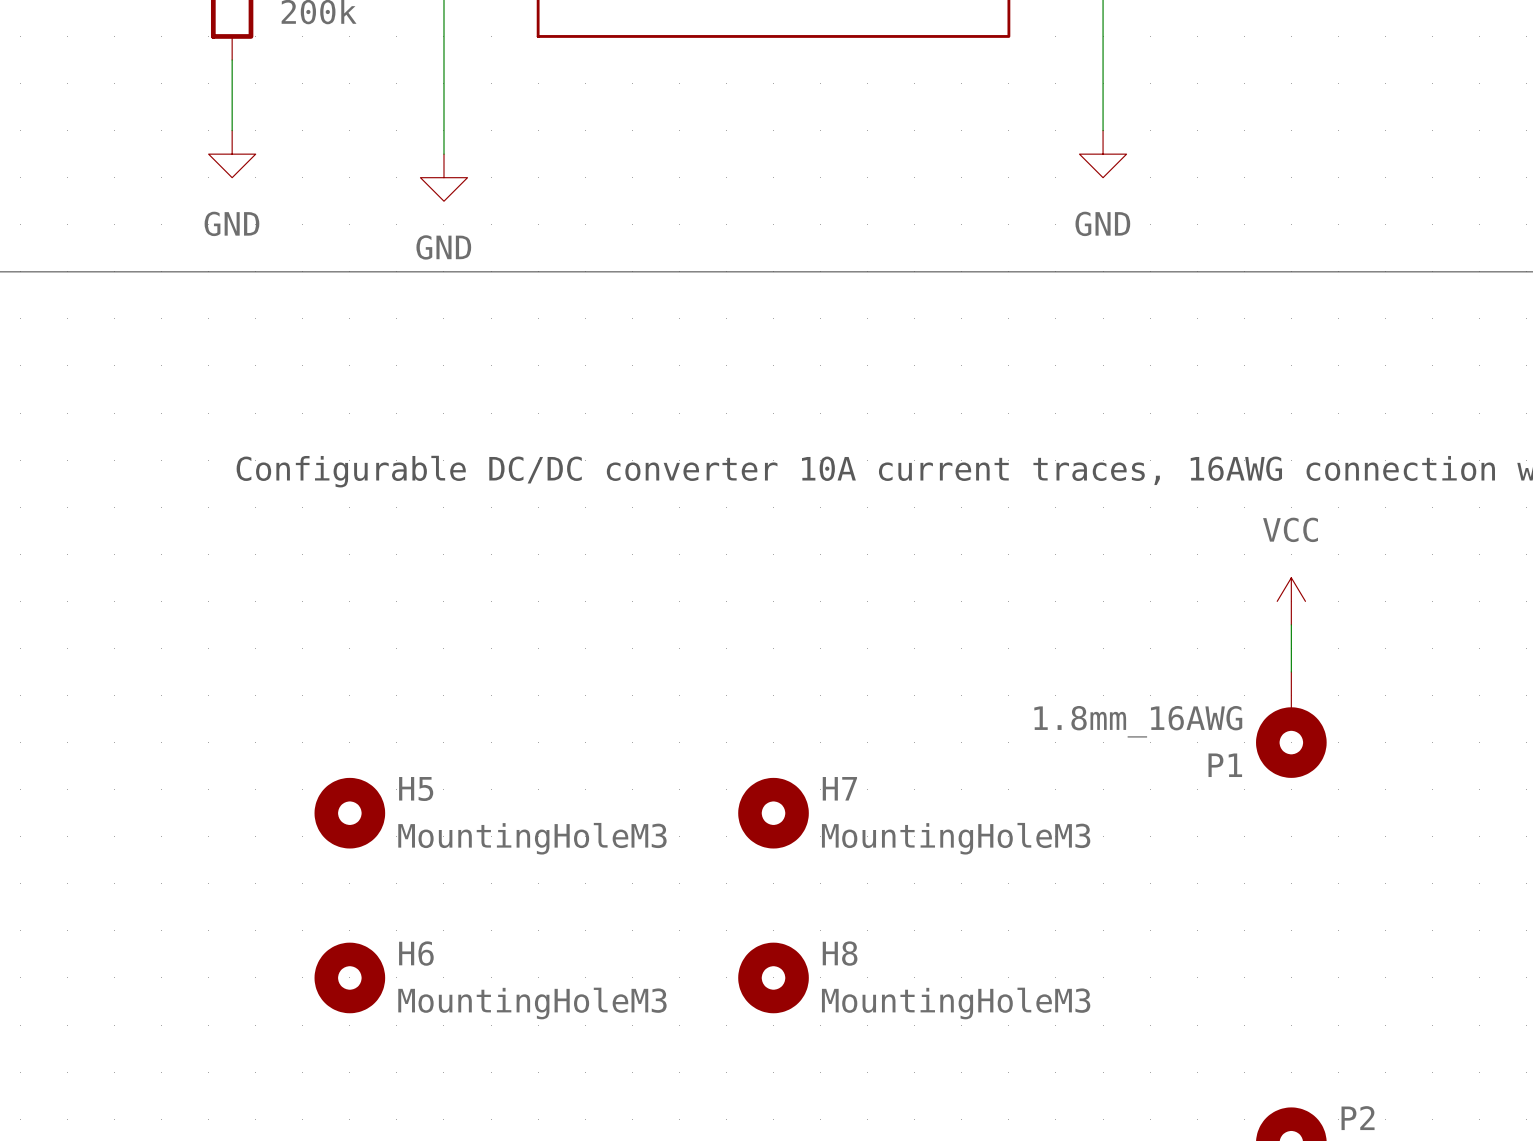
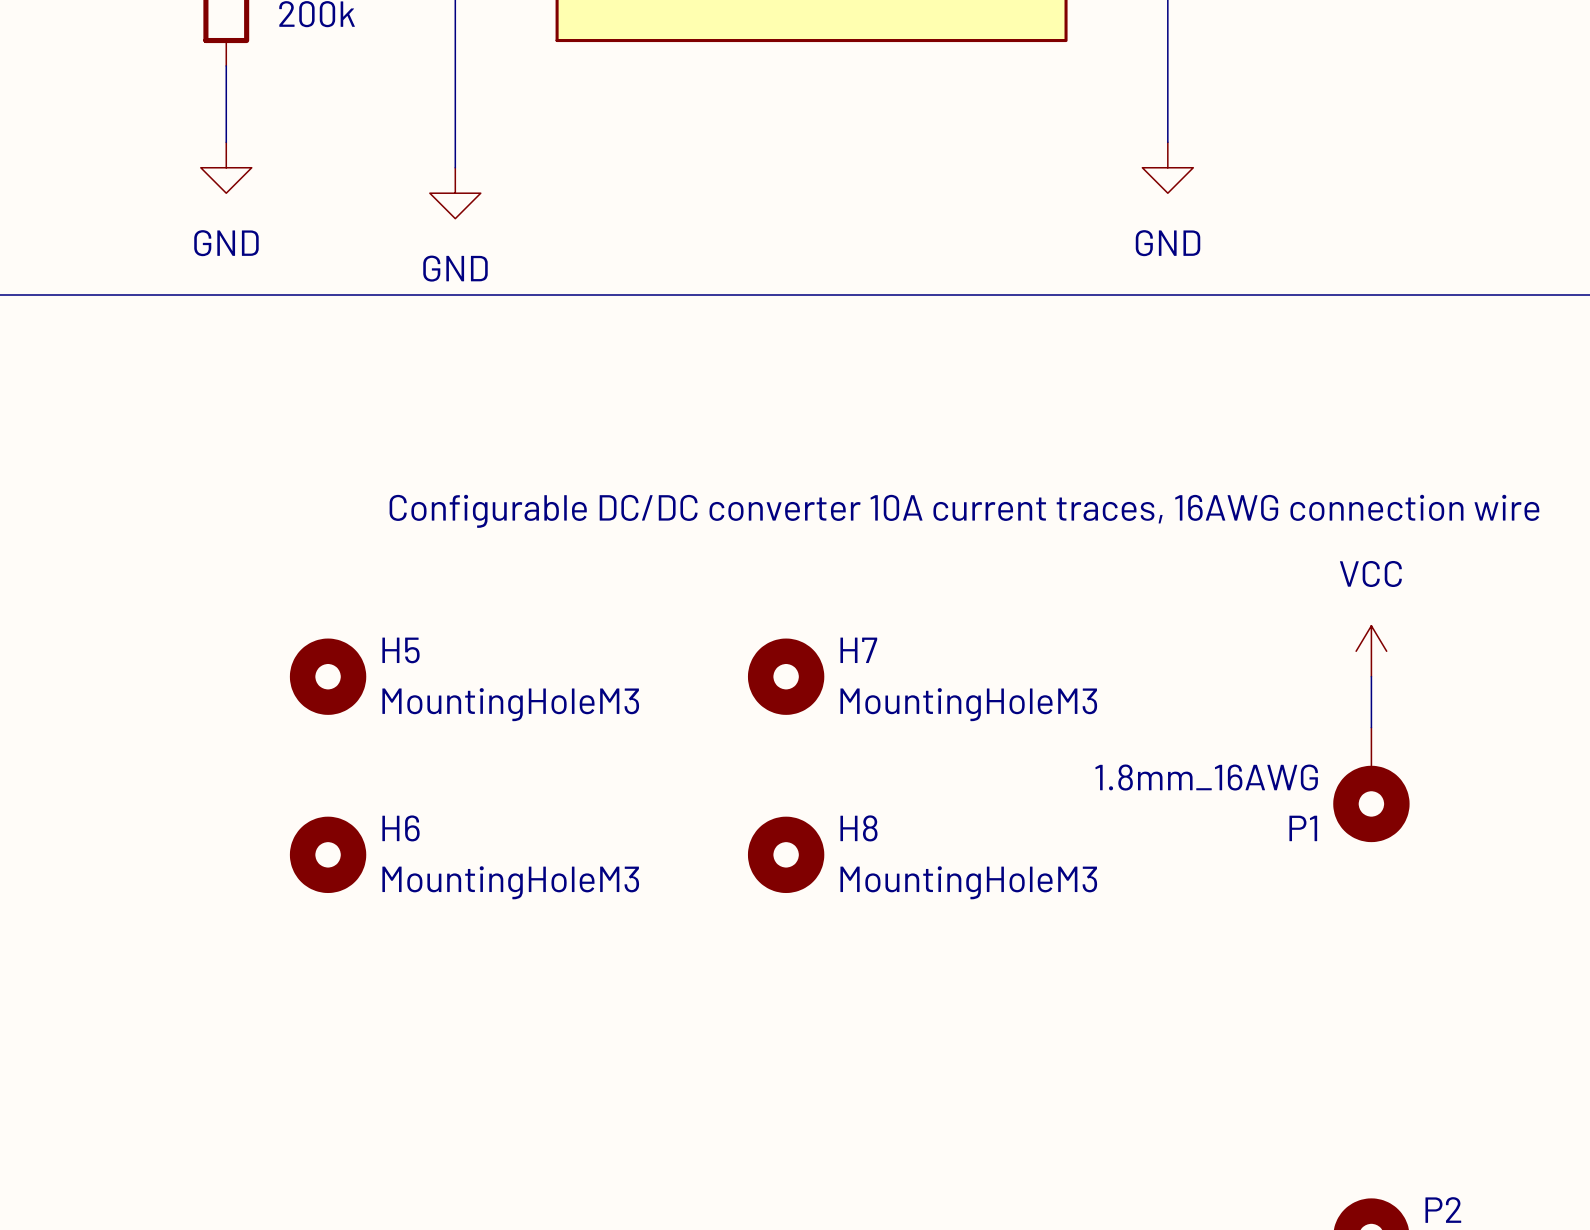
H5 position: (349, 813) -> (328, 676)
H7 position: (773, 813) -> (786, 676)
H6 position: (349, 977) -> (328, 854)
H8 position: (773, 977) -> (786, 854)

